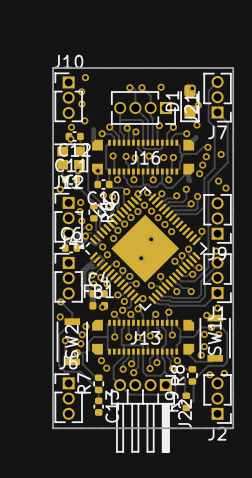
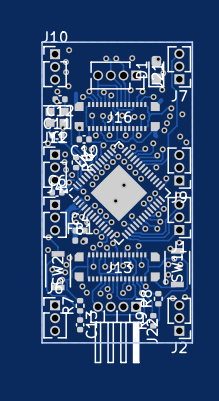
track: (217, 112) (227, 122) (227, 162) (208, 182) (208, 267) (194, 281) (180, 280) -> (160, 221) (158, 219) (148, 219)
via: none -> (156, 167)
via: none -> (160, 221)

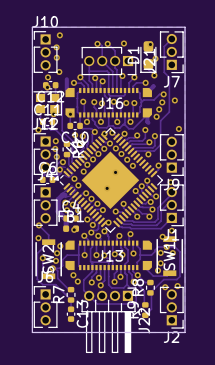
via: (180, 136) -> none

